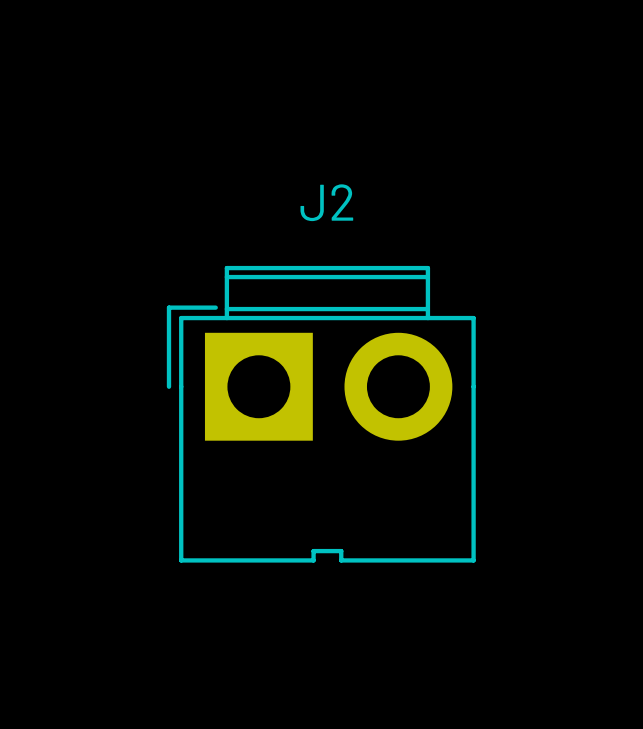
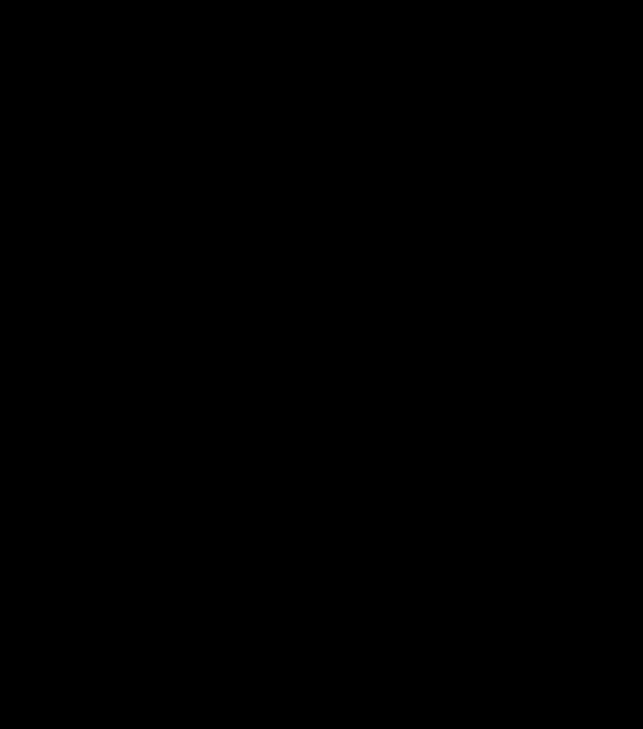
J2: (321, 414) -> none

